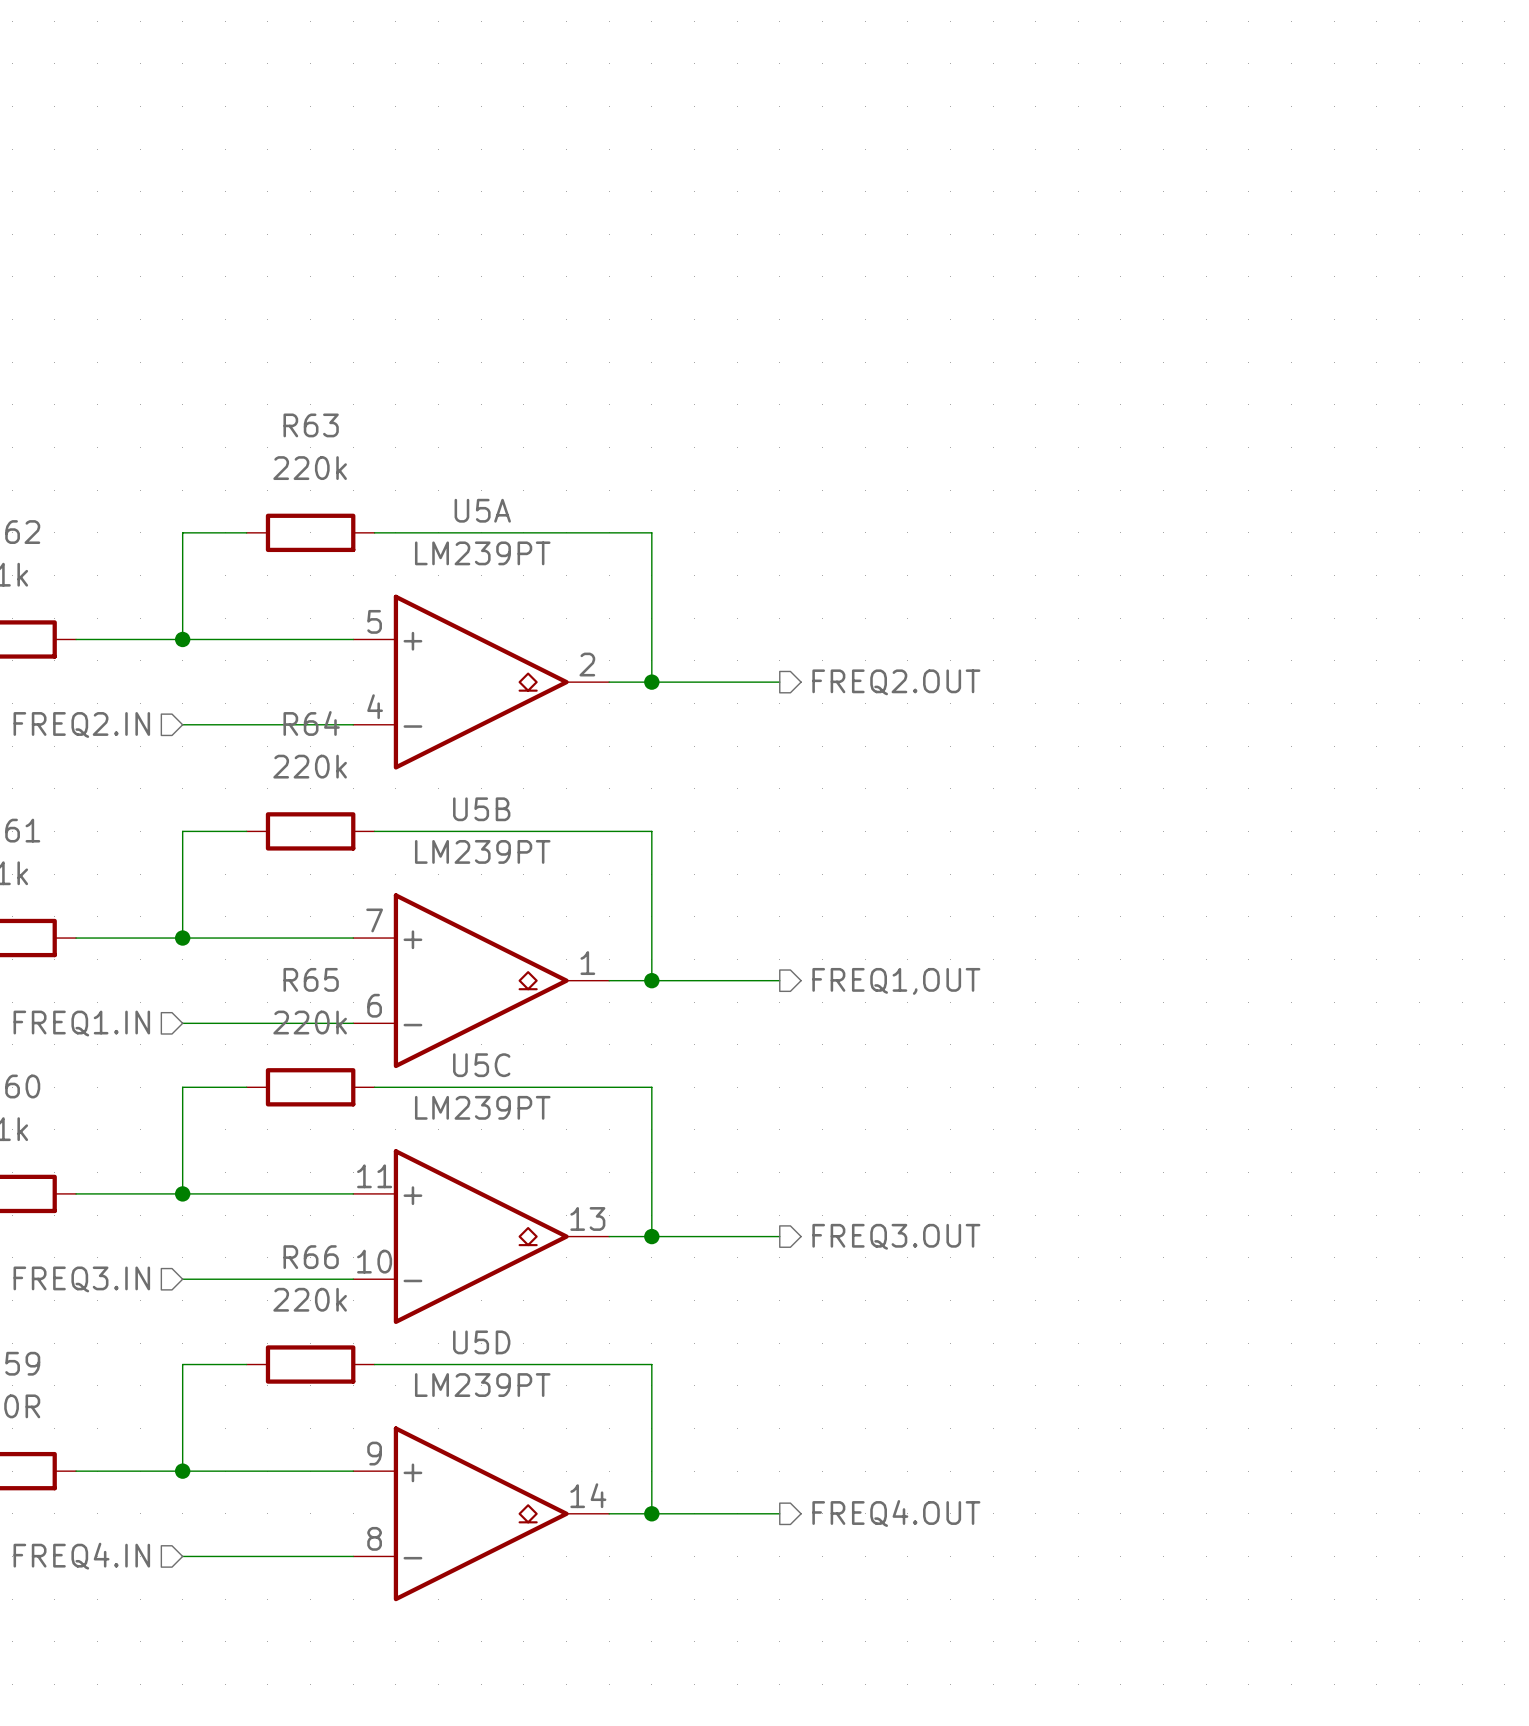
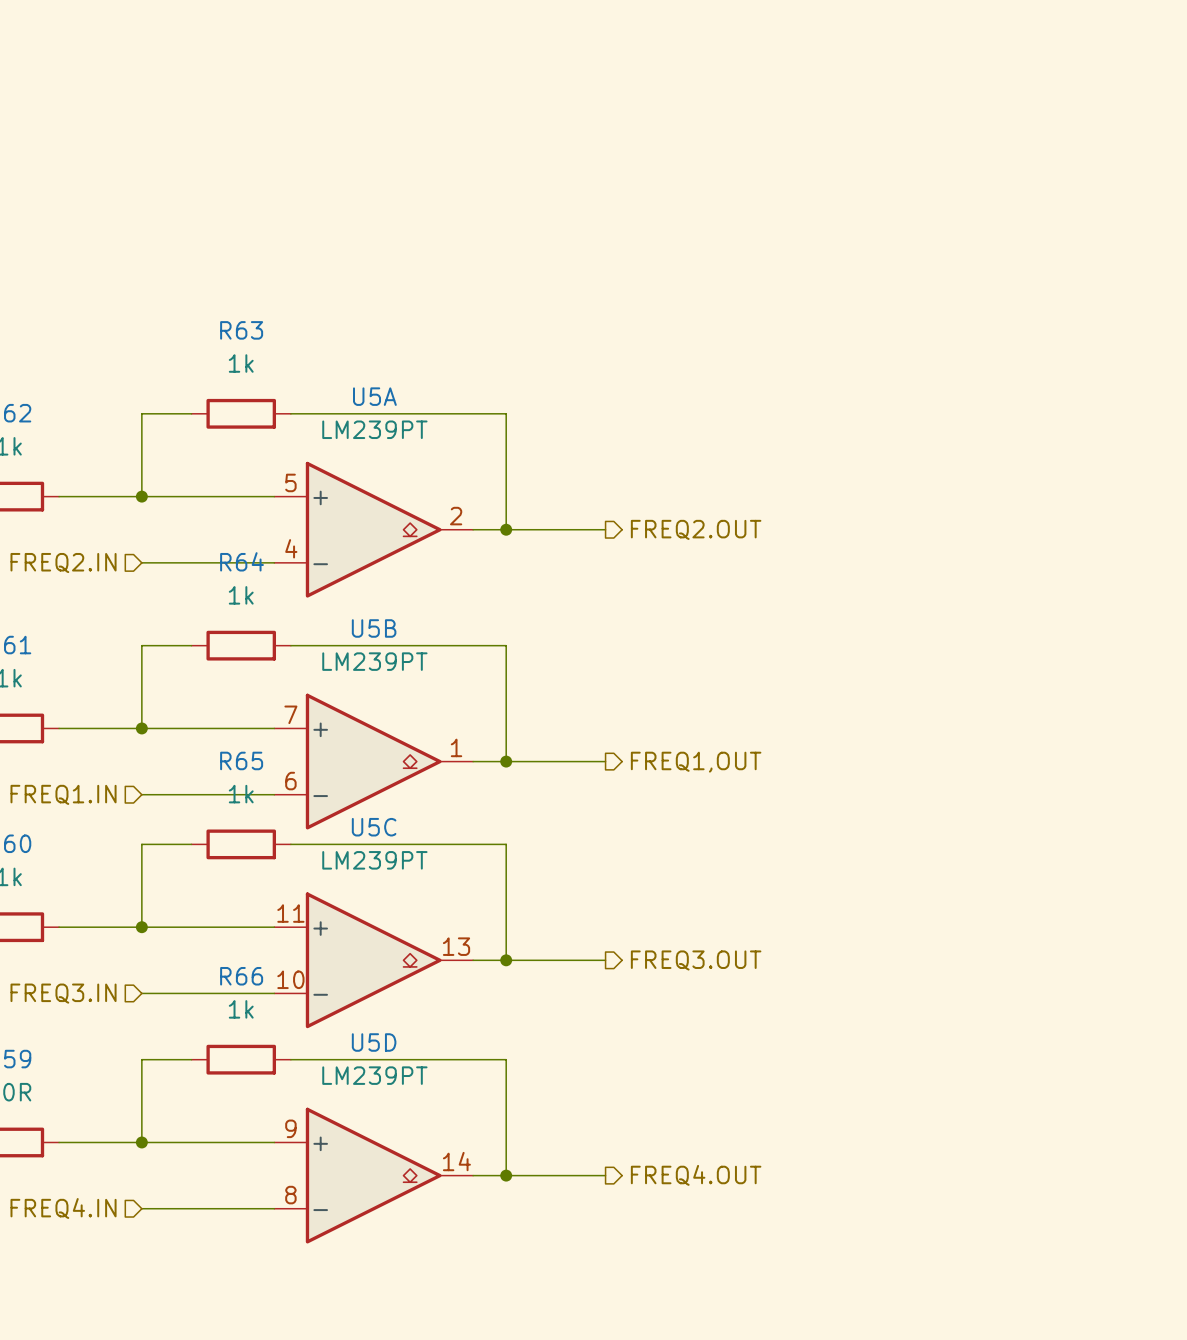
R63 value: 220k (310, 468) -> 1k (241, 363)
R64 value: 220k (310, 766) -> 1k (241, 595)
R65 value: 220k (310, 1022) -> 1k (241, 794)
R66 value: 220k (310, 1299) -> 1k (241, 1009)

